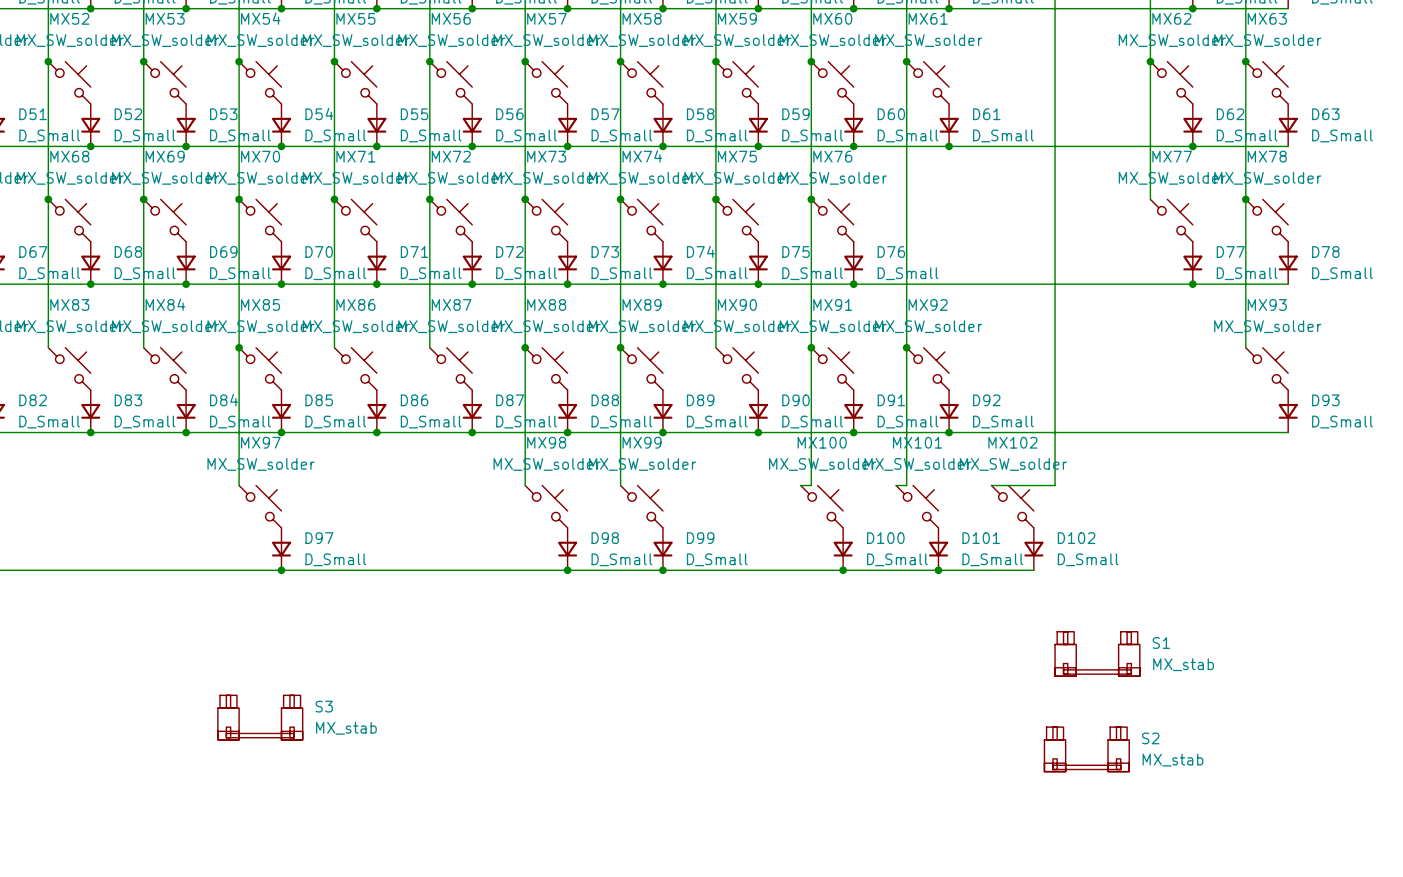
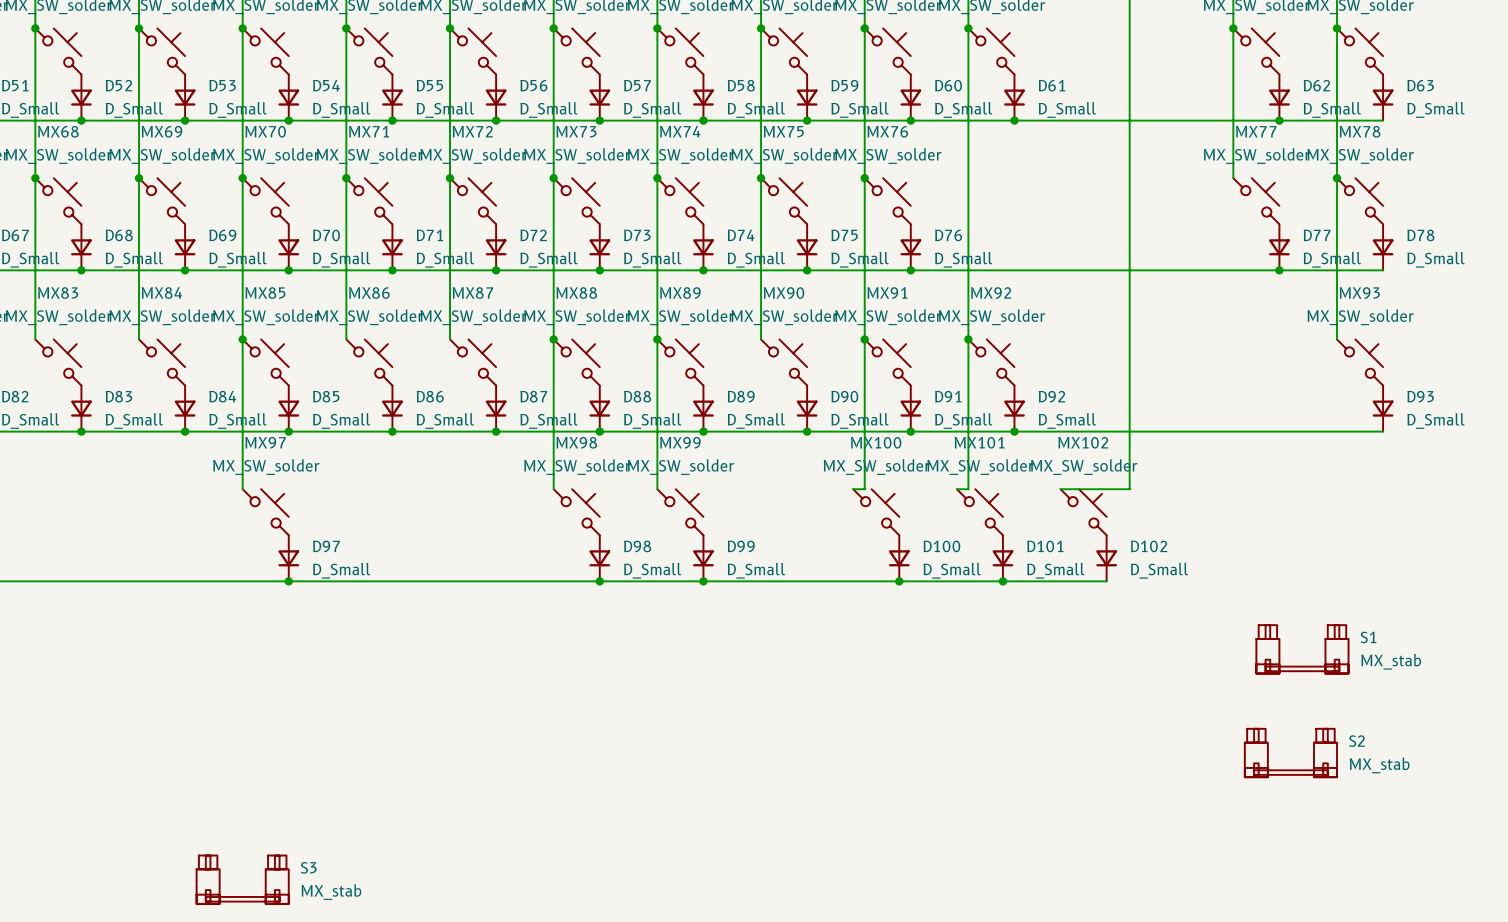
S1 position: (1097, 654) -> (1302, 649)
S3 position: (260, 717) -> (242, 879)
S2 position: (1086, 749) -> (1290, 753)

